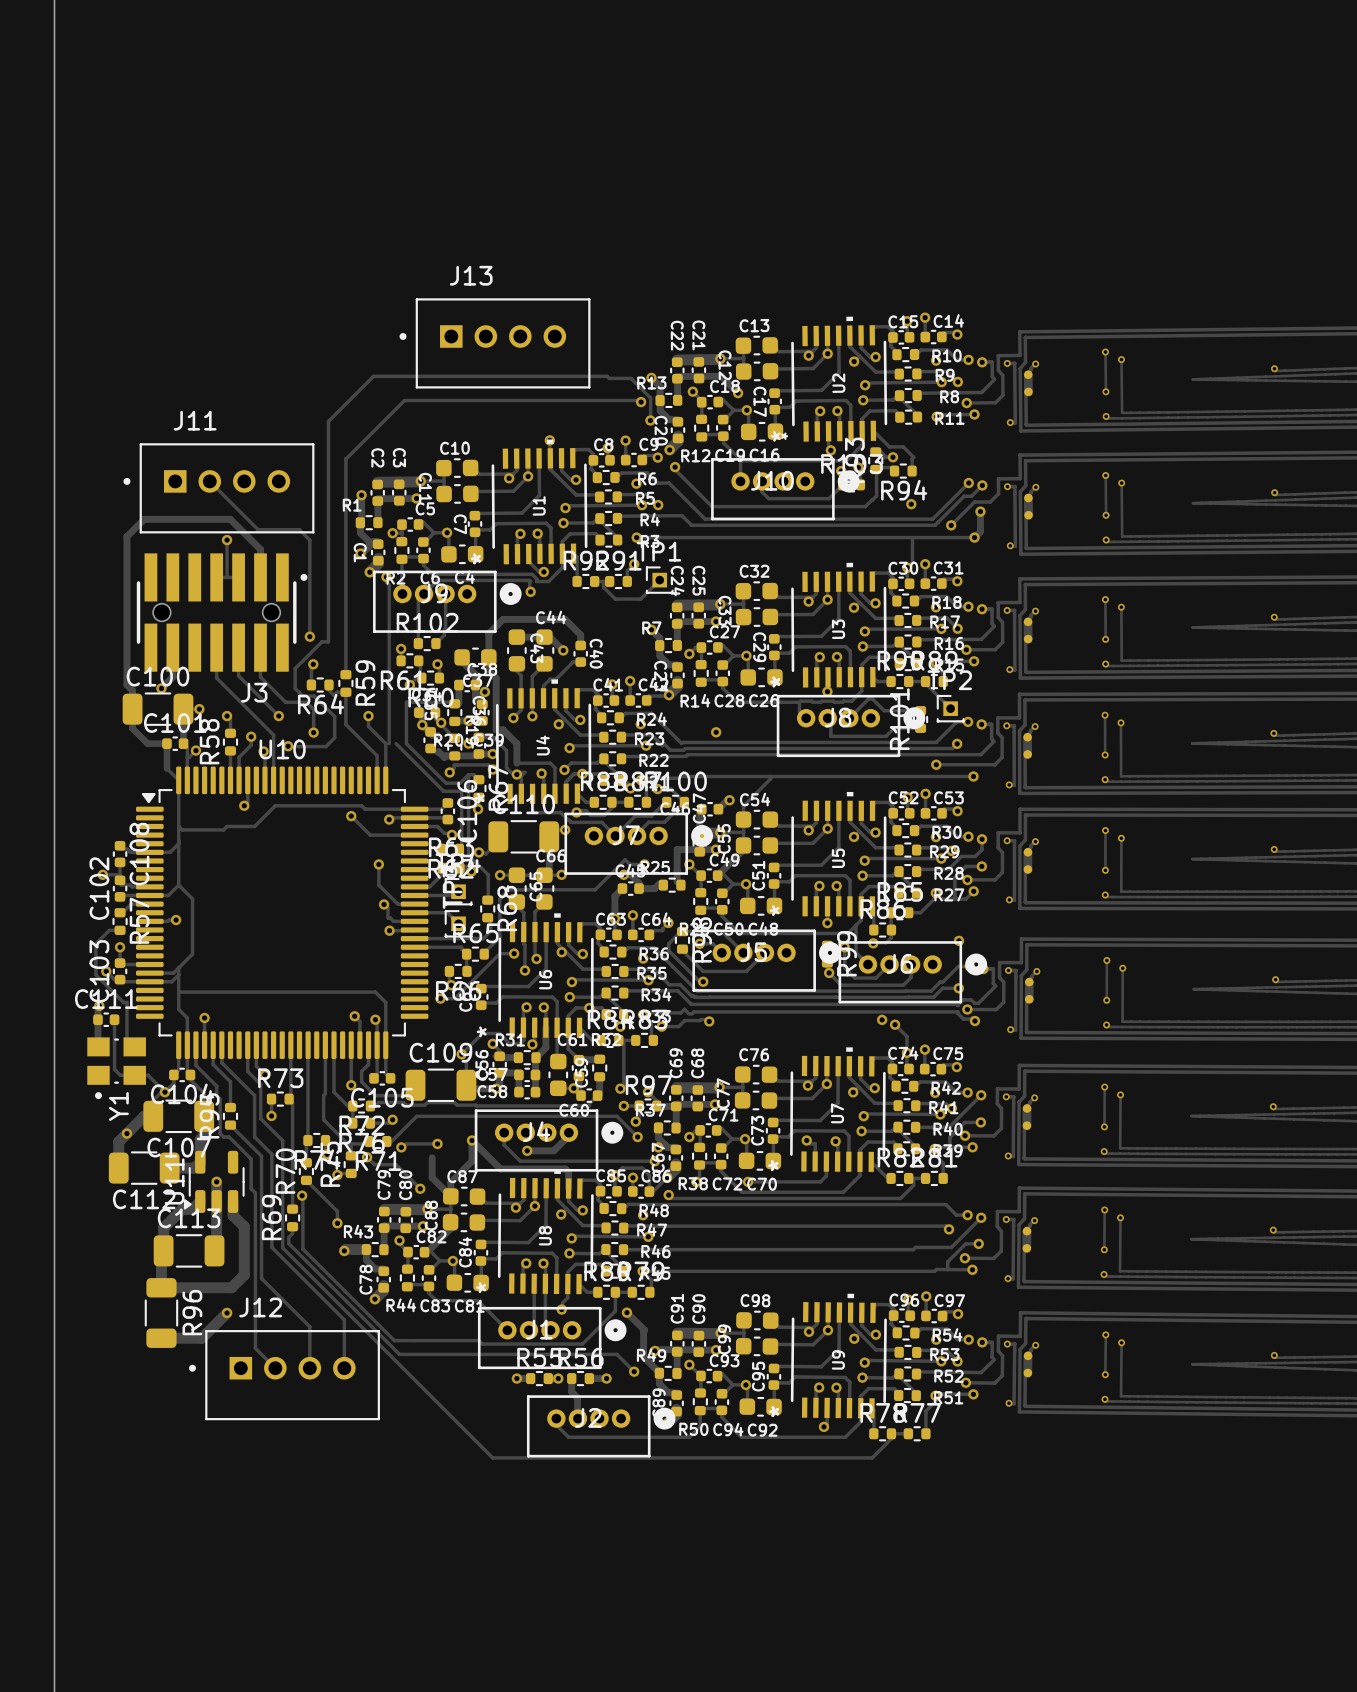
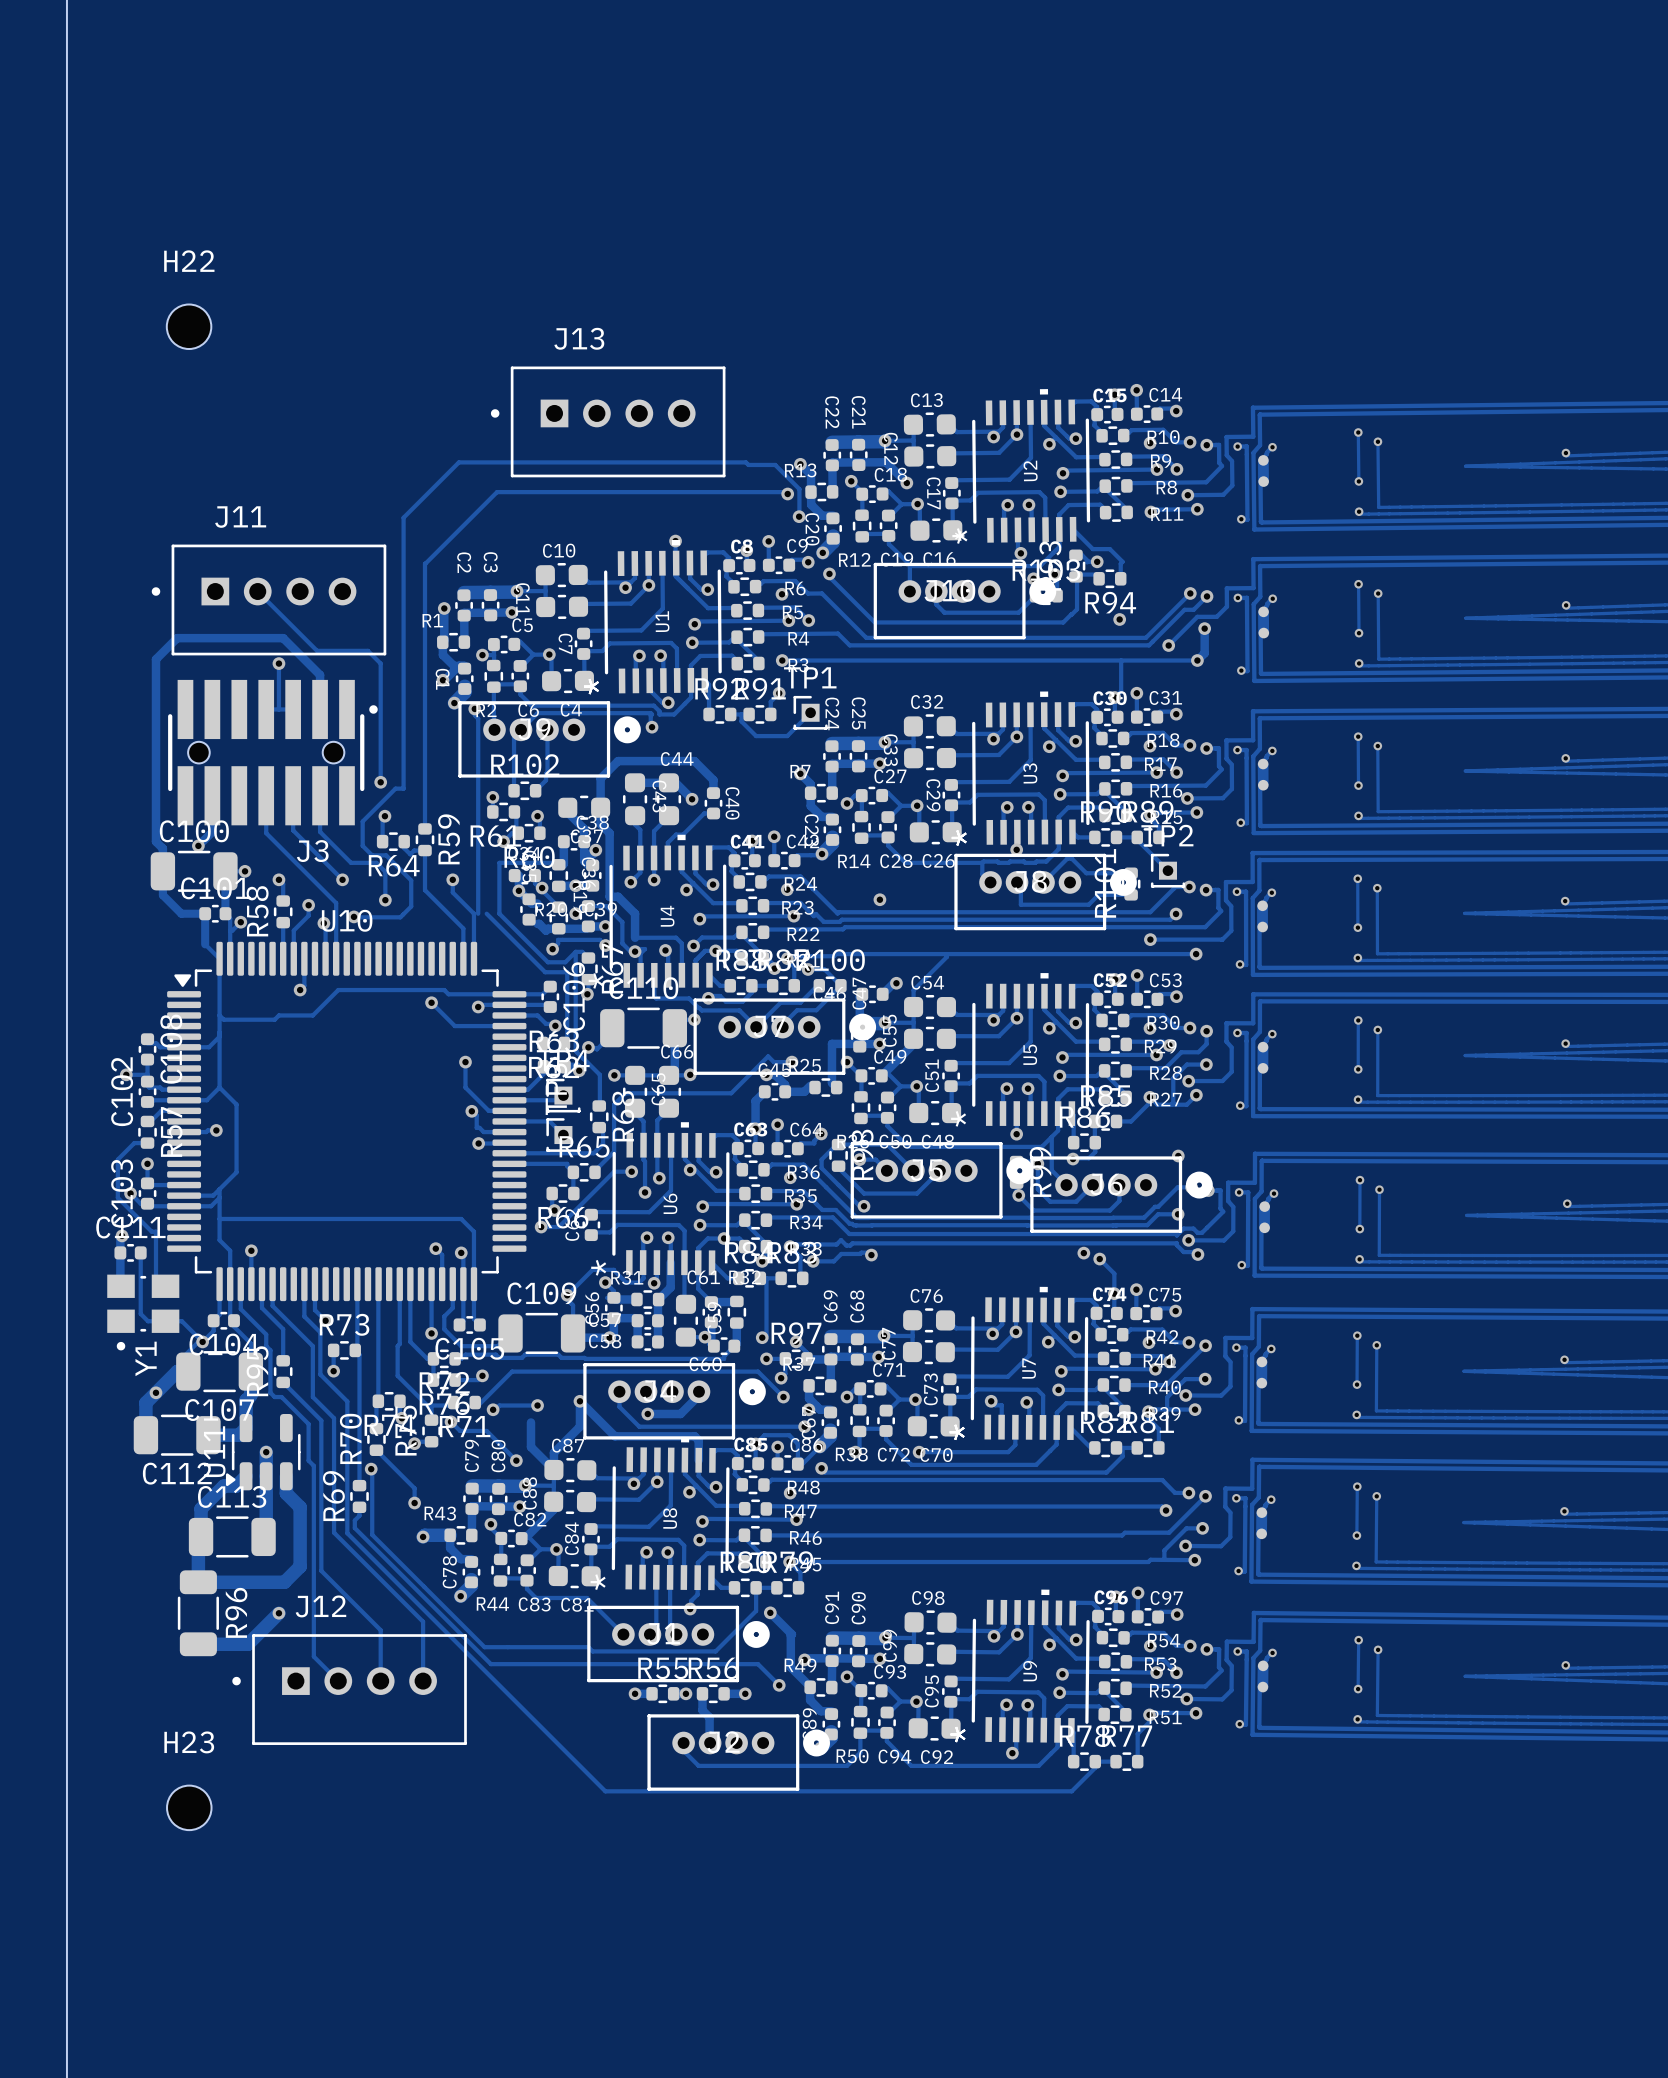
H22: none -> (189, 326)
H23: none -> (189, 1807)

